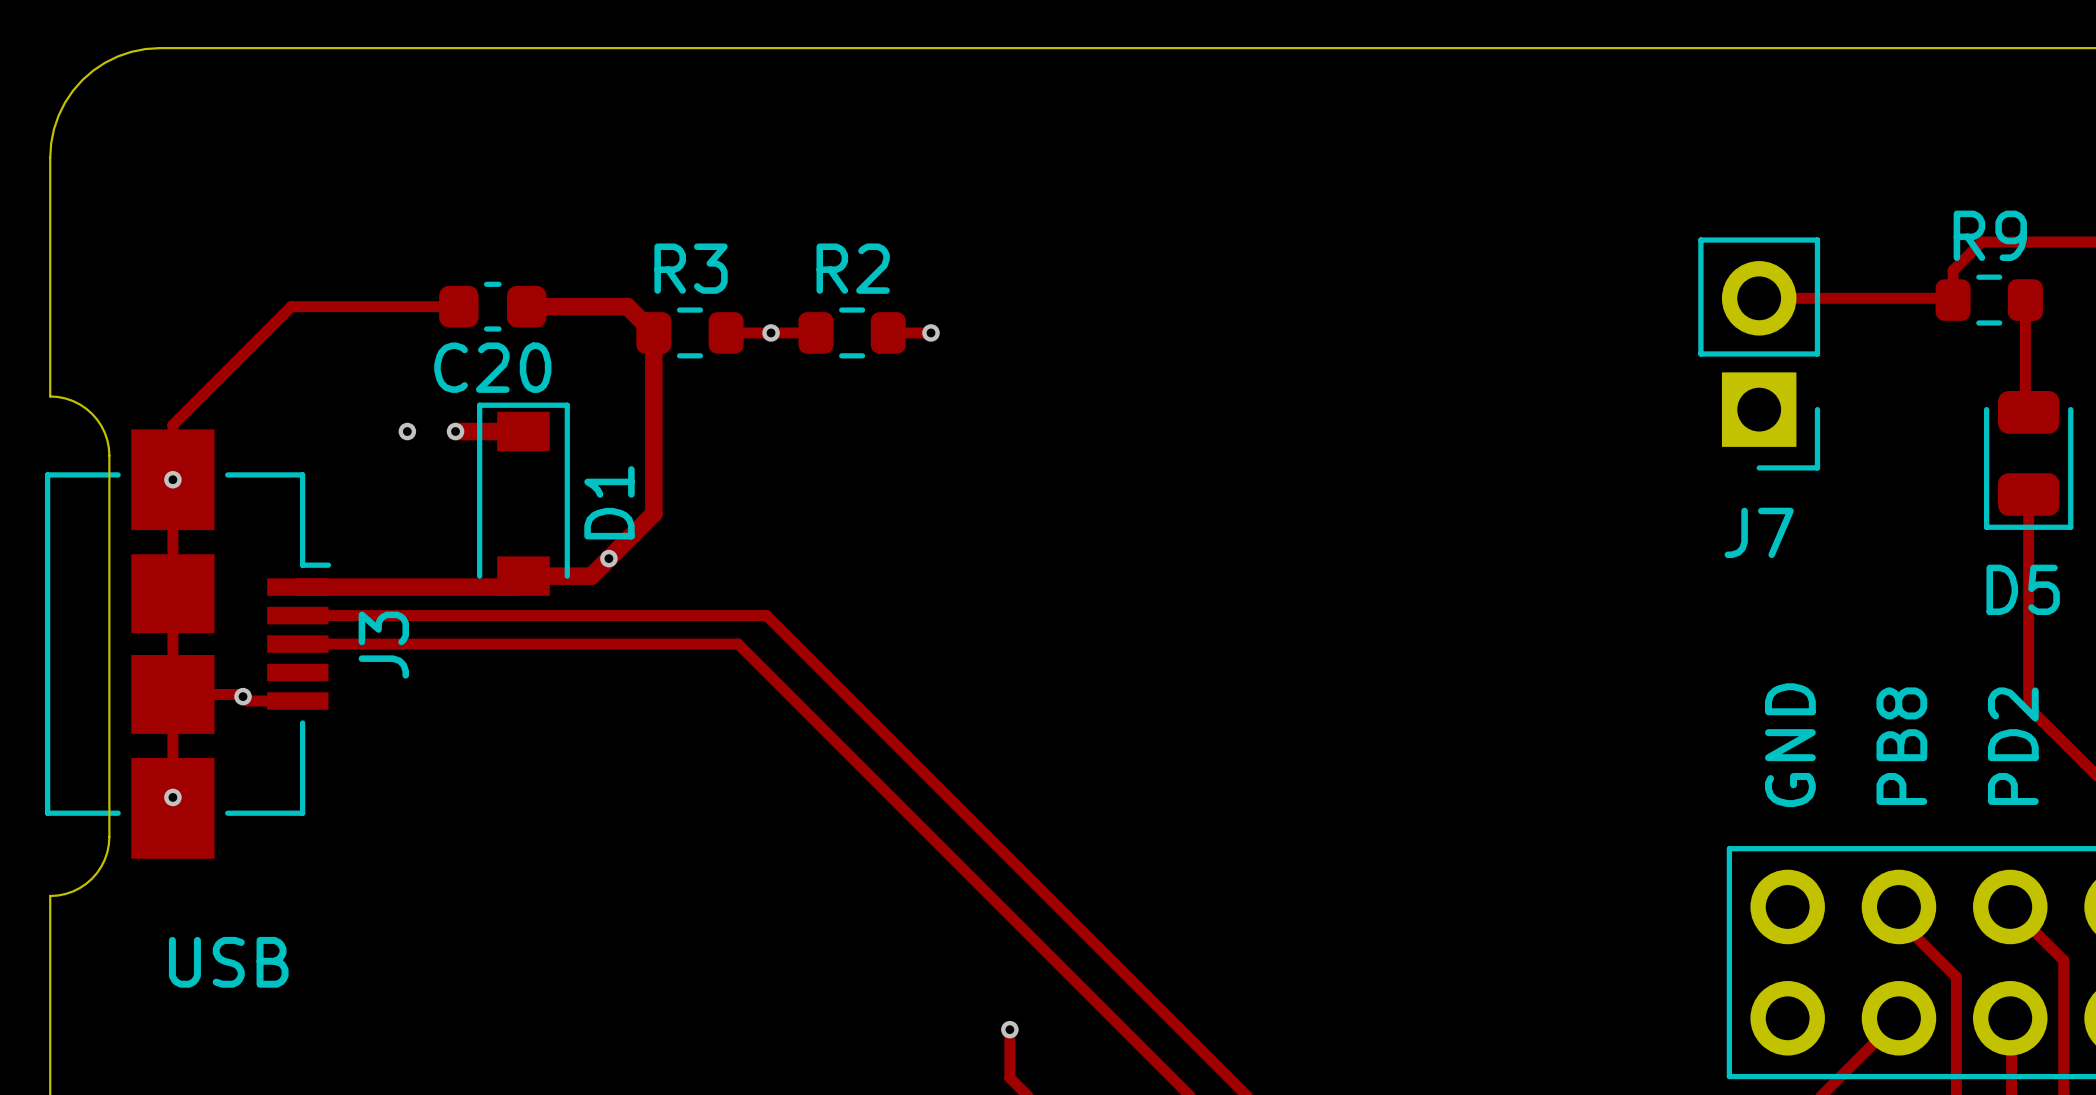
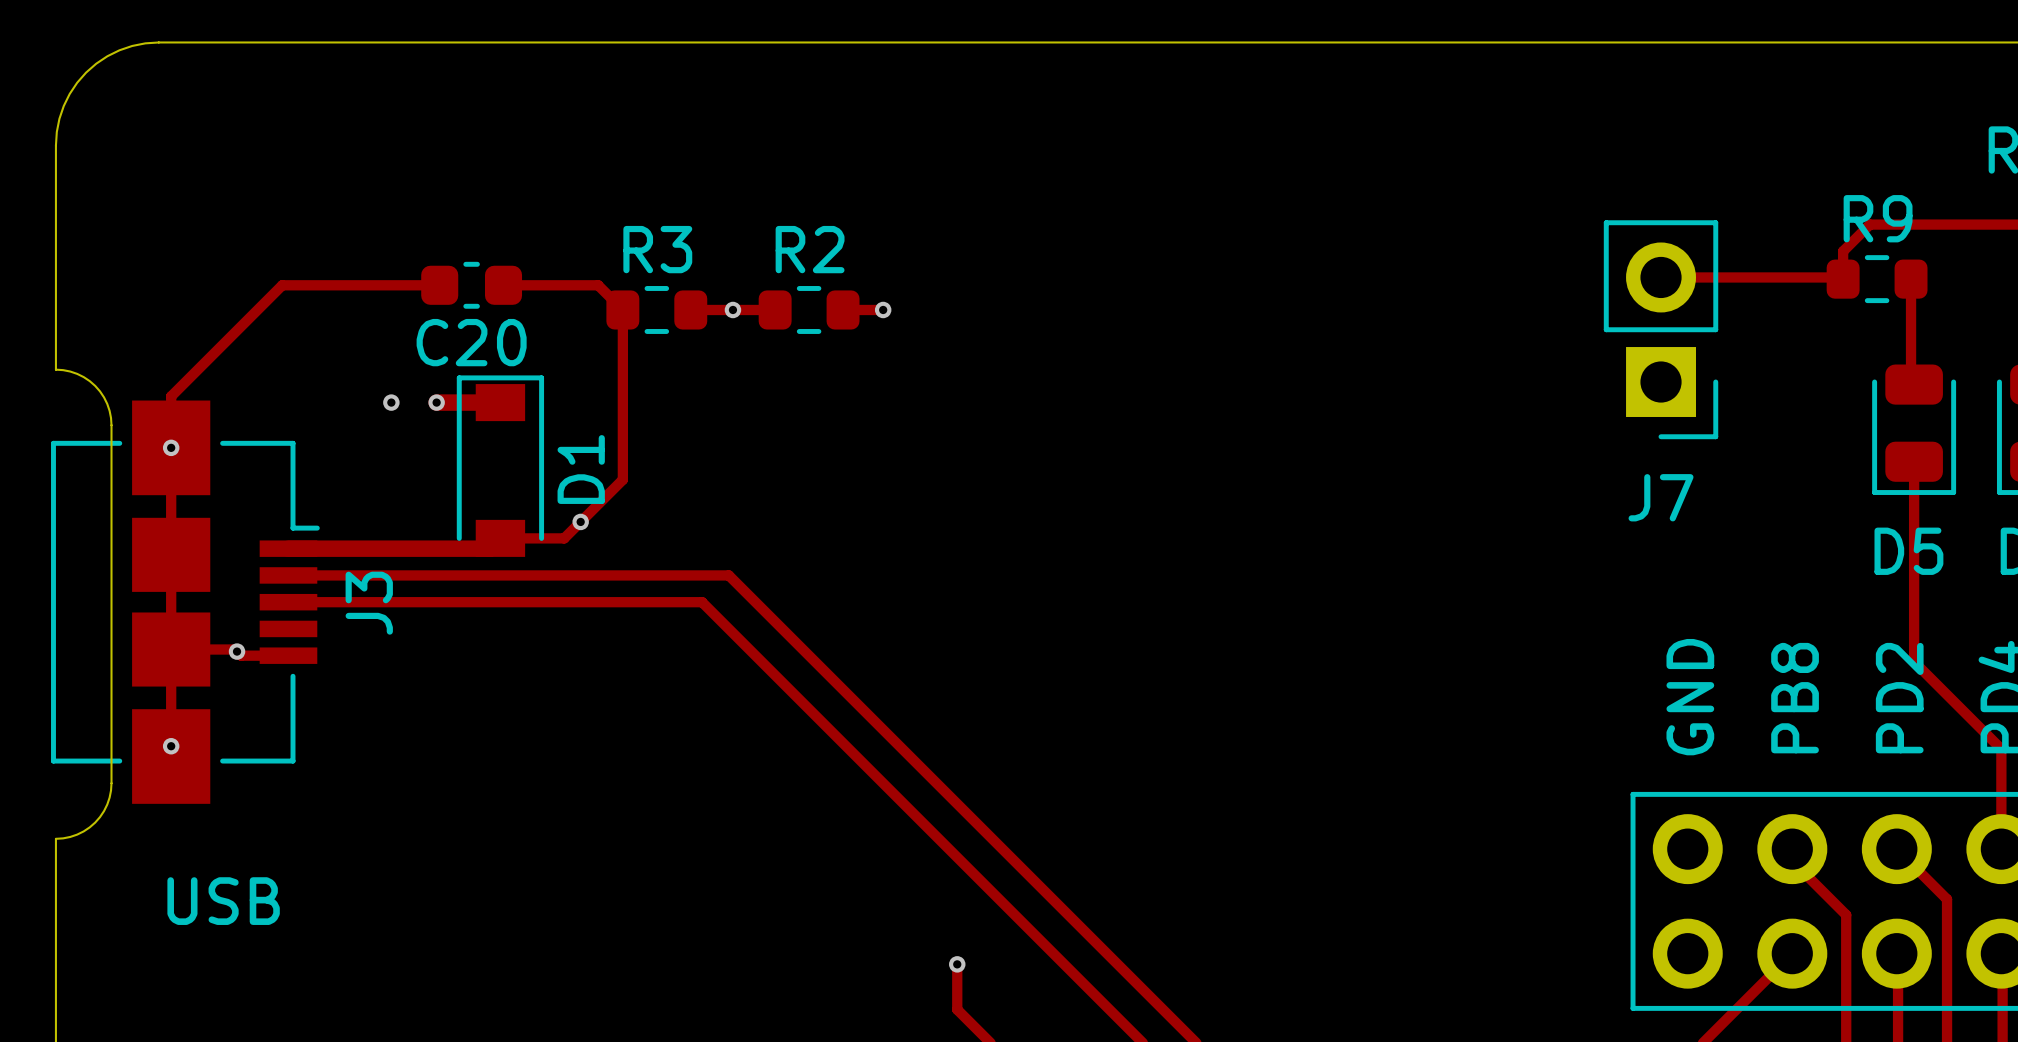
track width: thick (526, 306) (627, 306) (653, 332) (653, 513) (591, 576) (523, 576) -> thin (503, 285) (598, 285) (622, 309) (622, 479) (564, 538) (500, 538)

